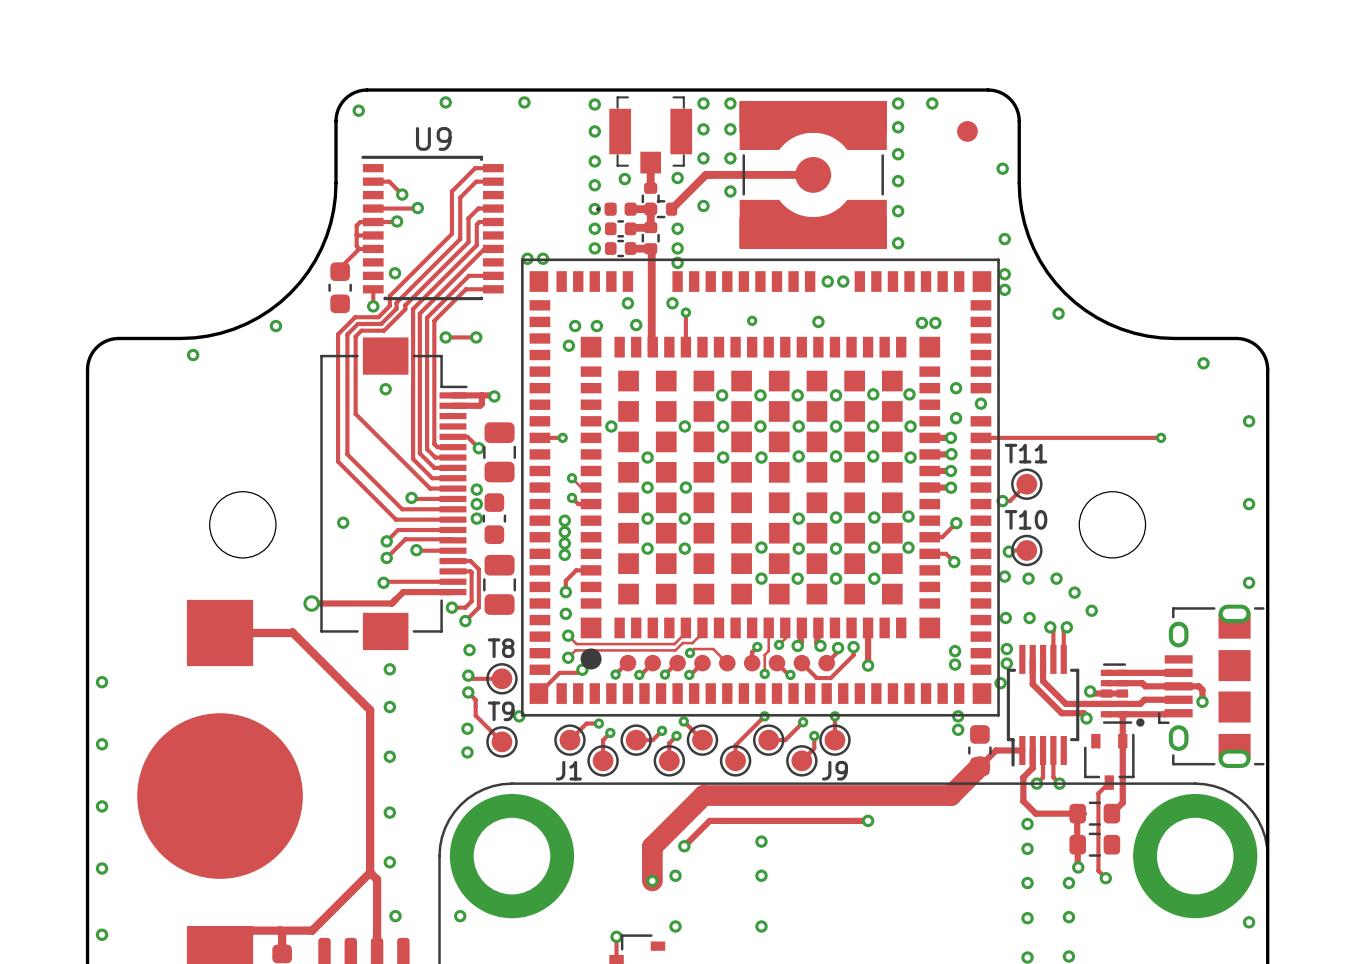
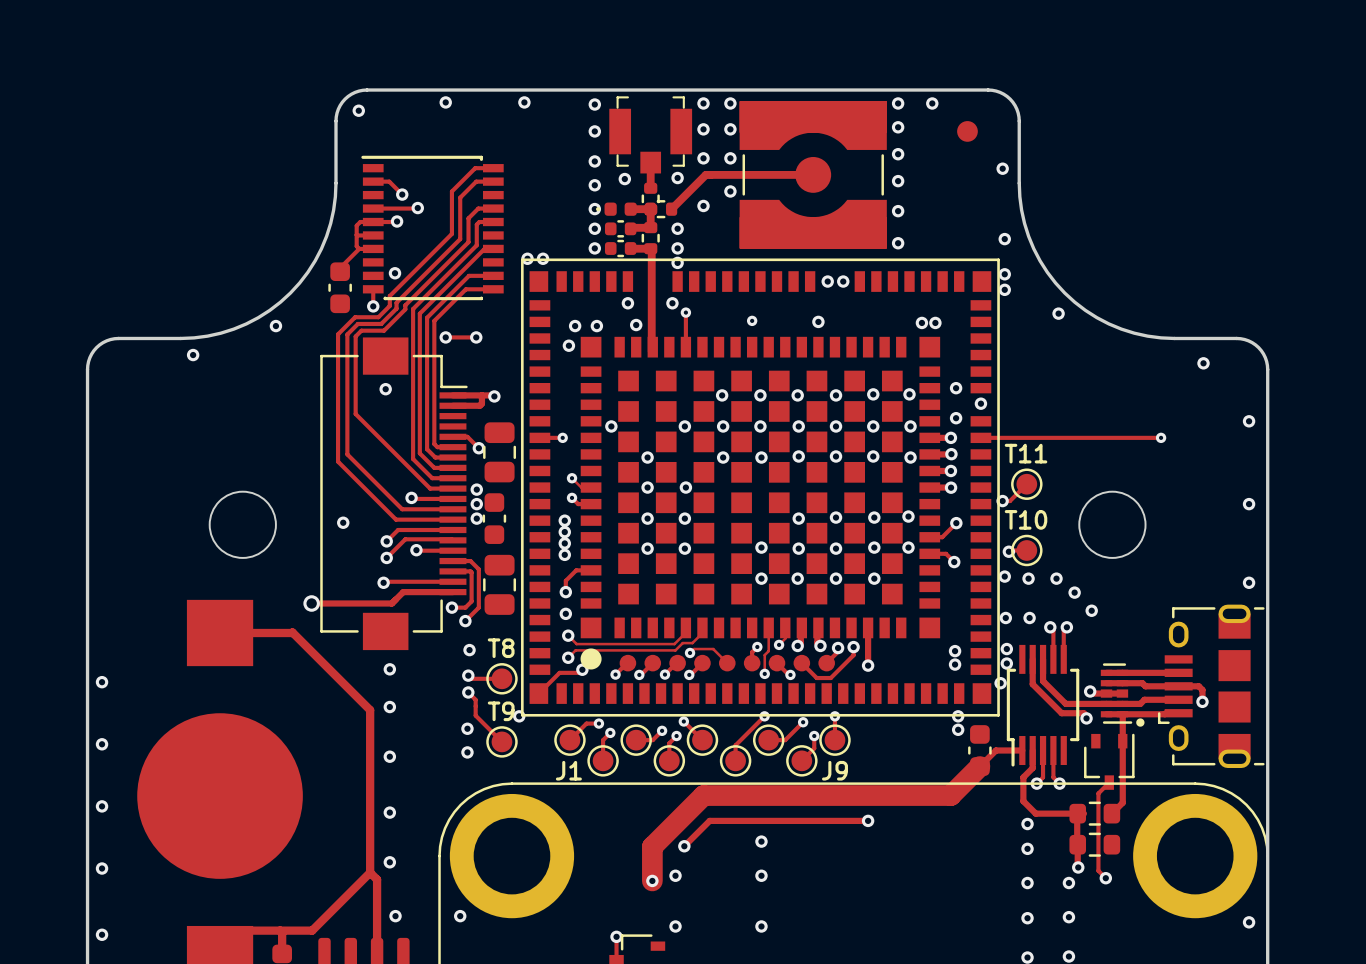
U9 name: U9 (433, 138) -> none

